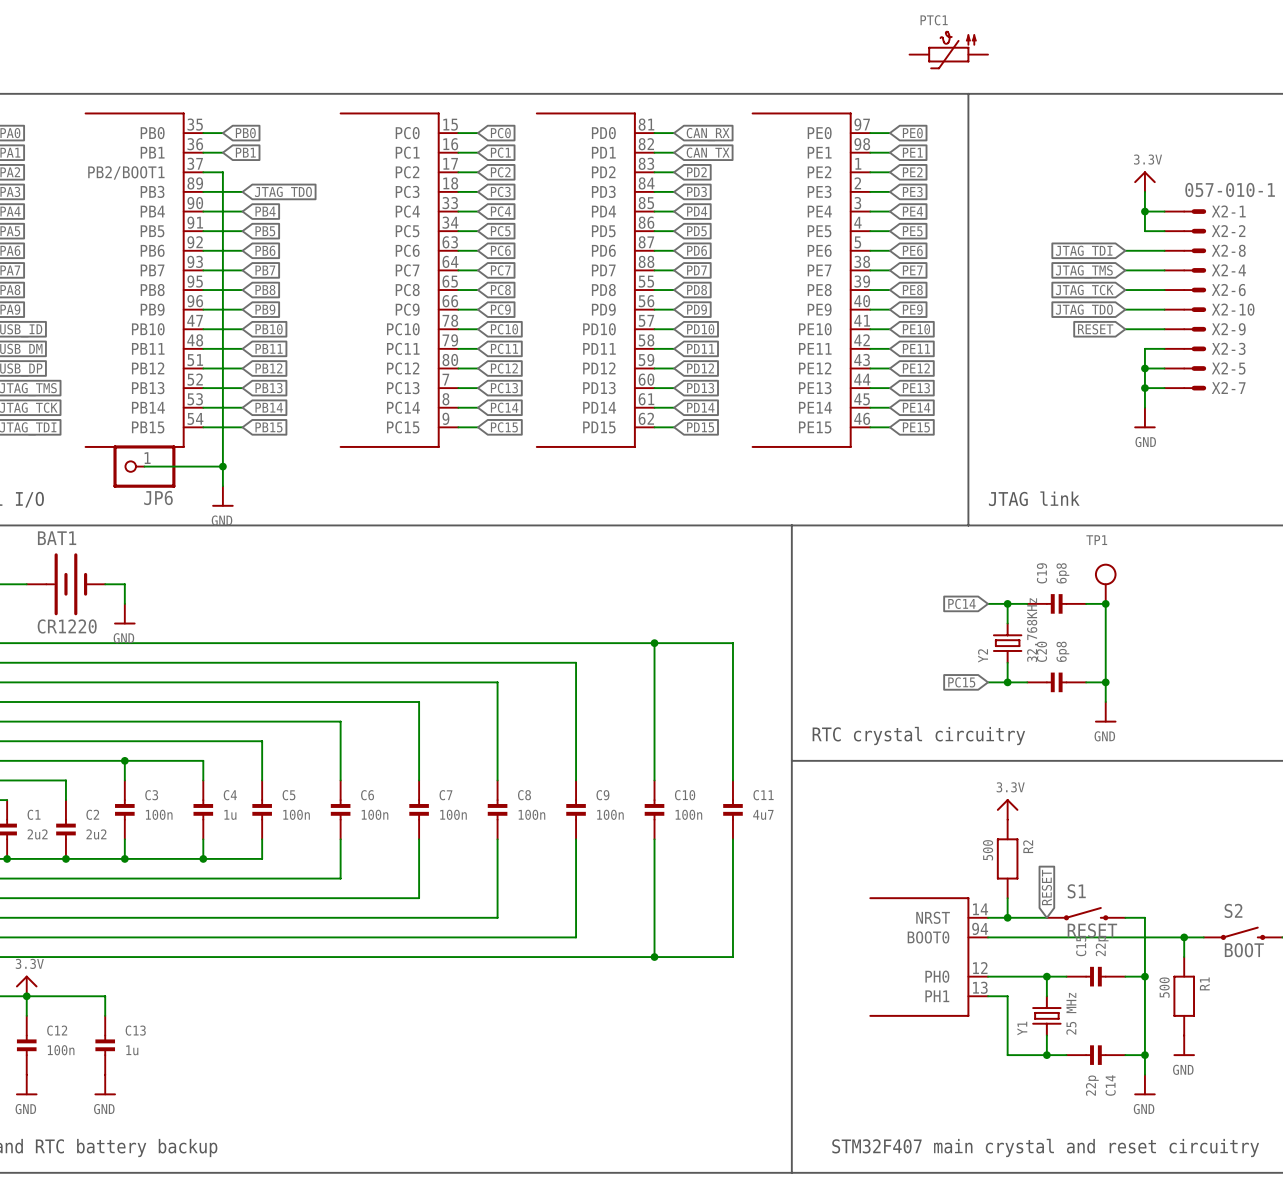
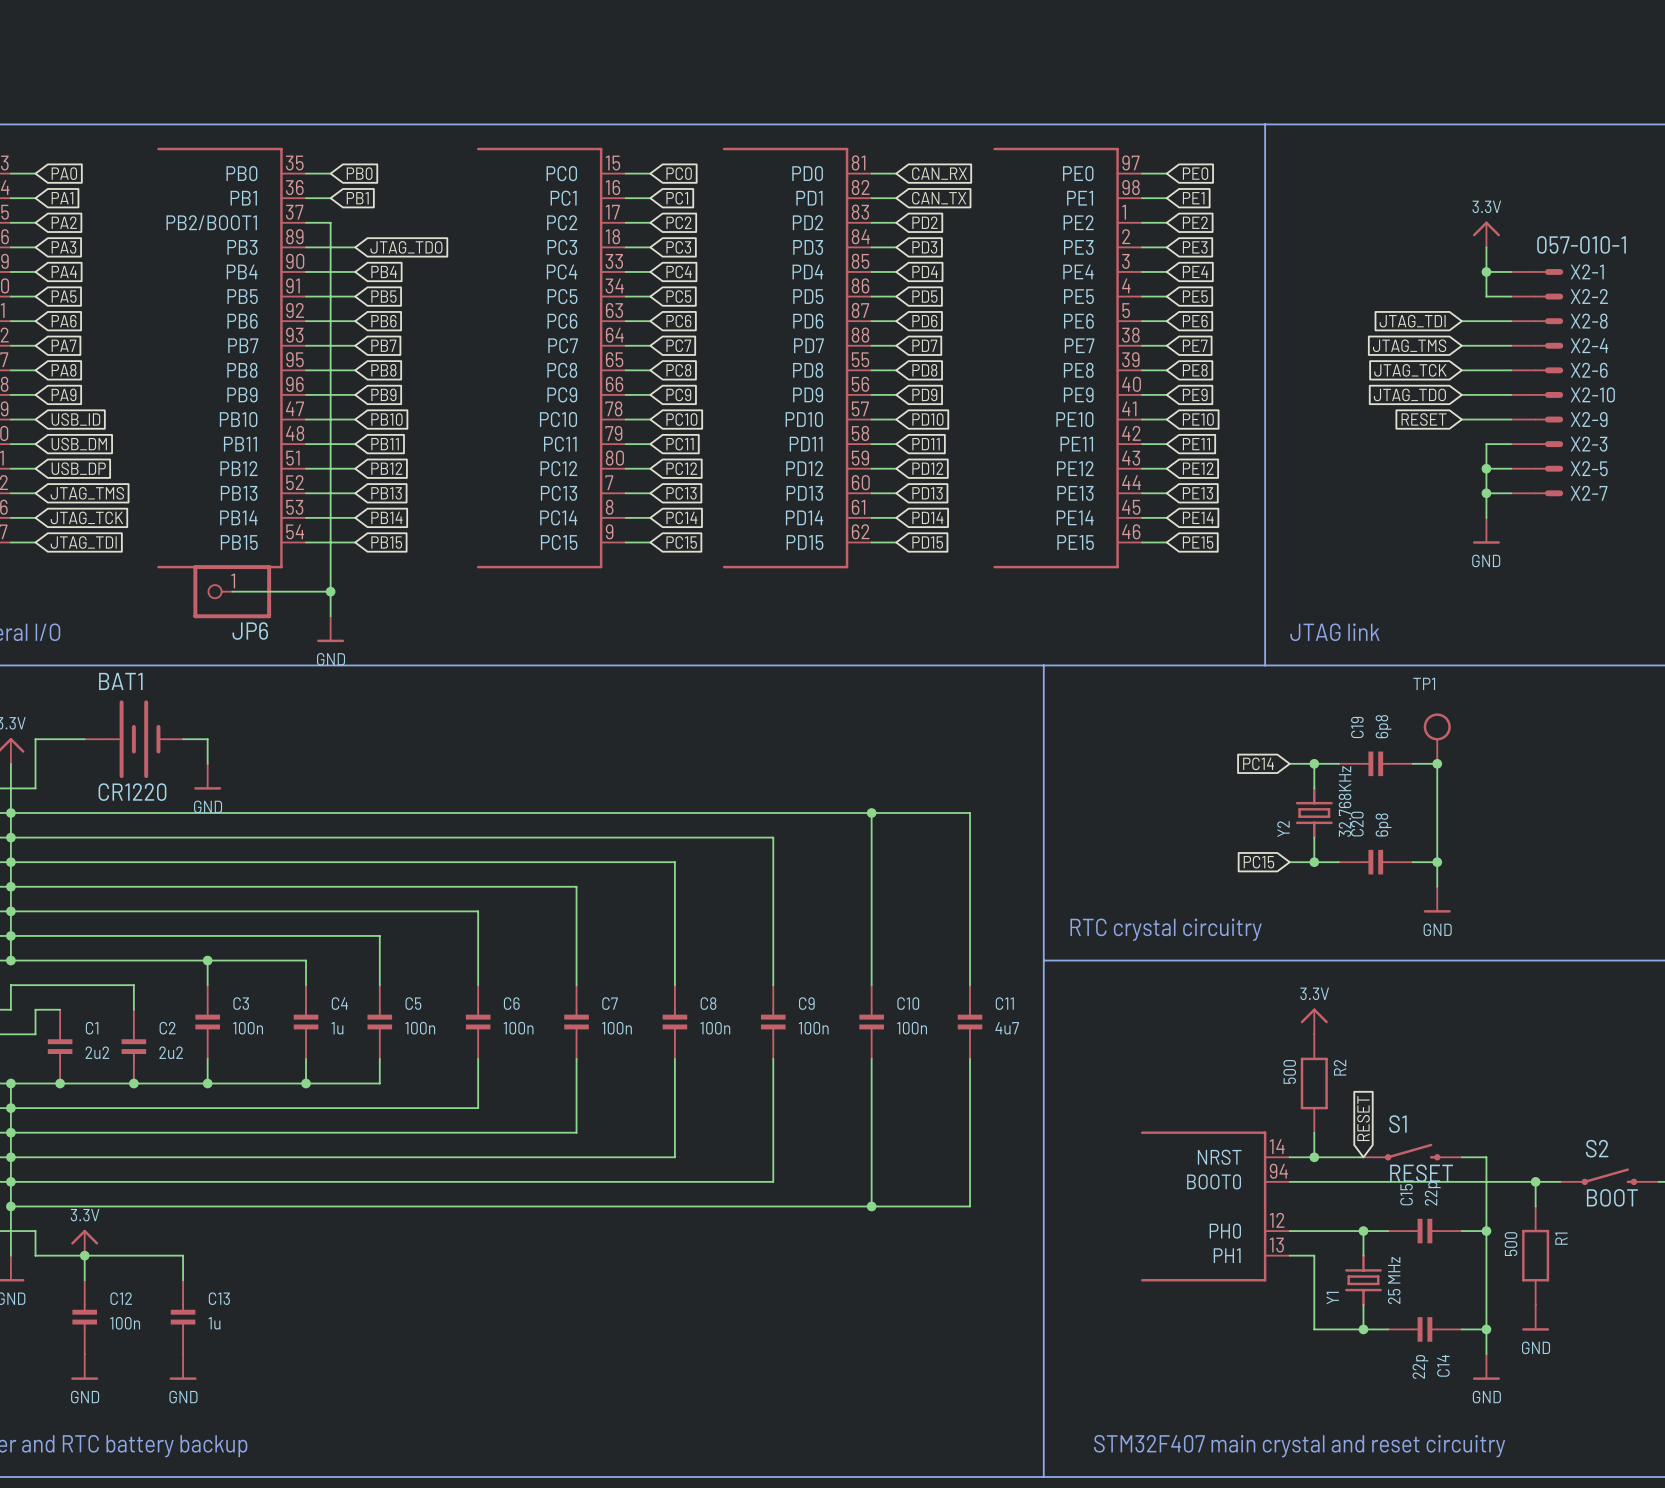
PTC1: (948, 50) -> none

